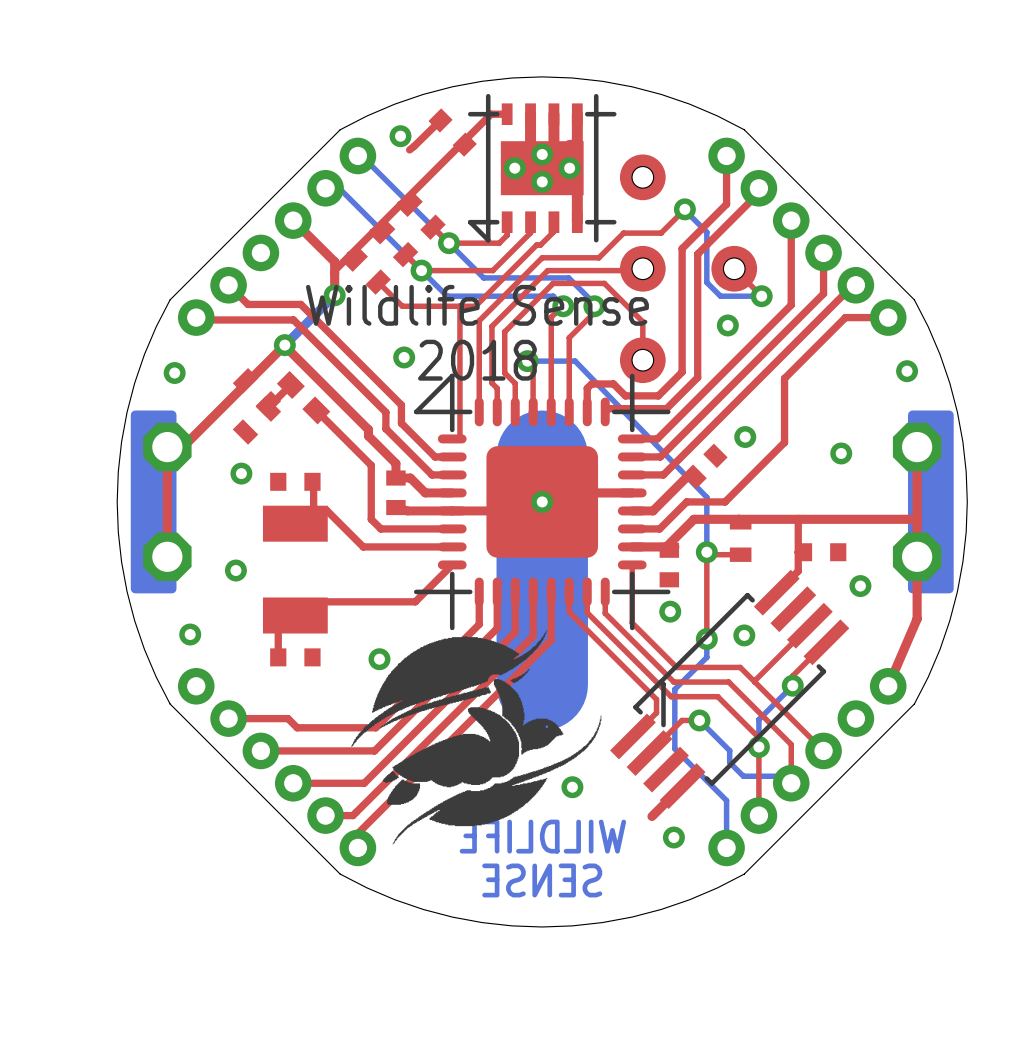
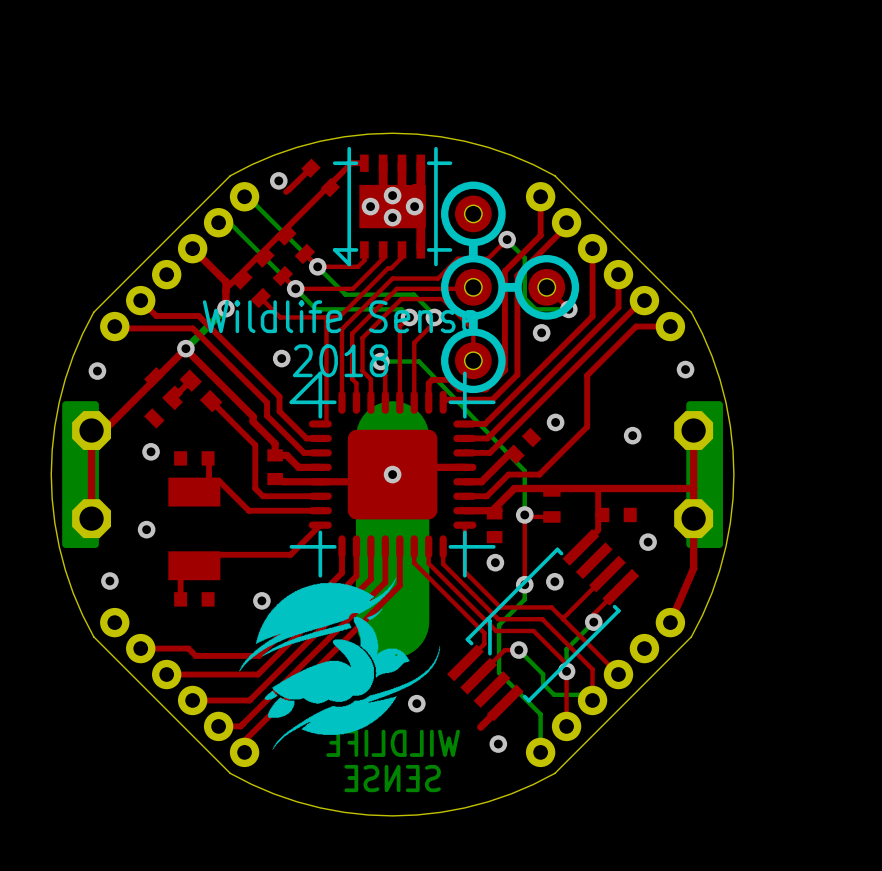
part footprint: [619, 154, 758, 384] -> [441, 181, 580, 394]

